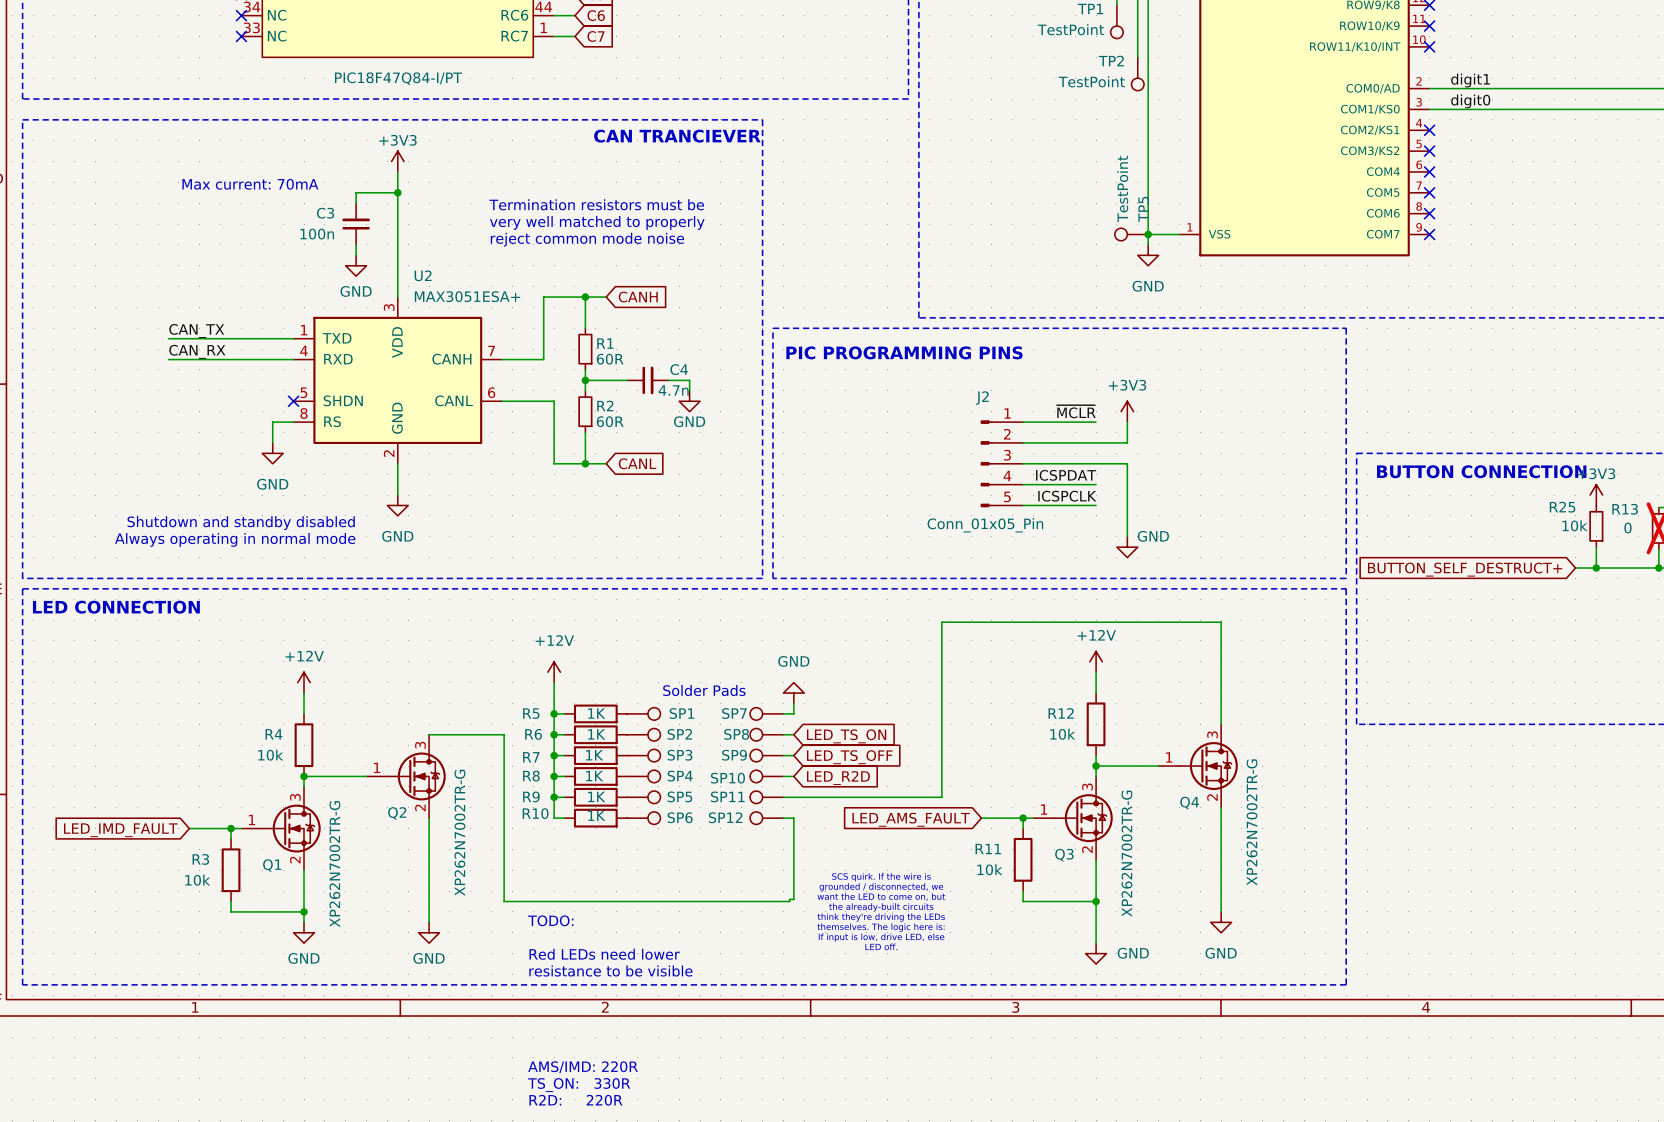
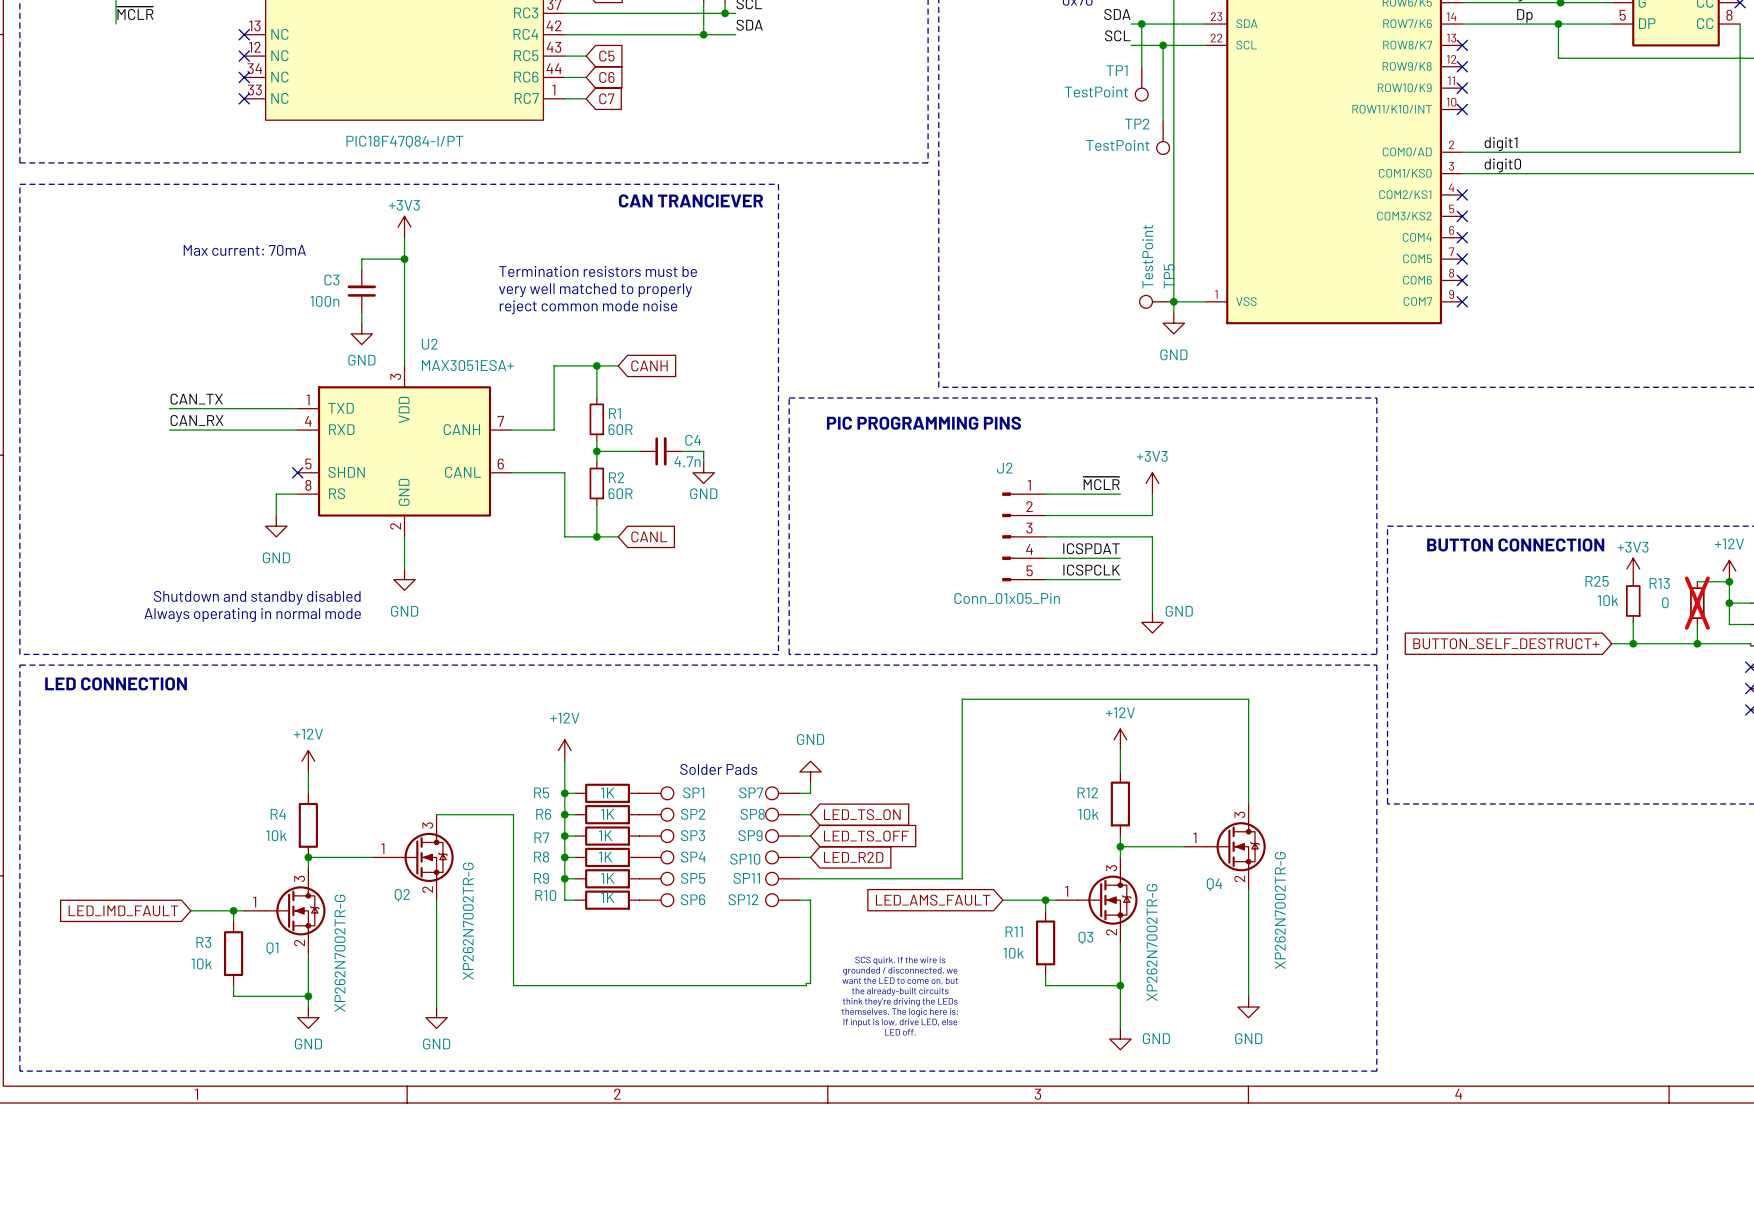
text: TODO: (550, 920) -> none
text: Red LEDs need lower (604, 954) -> none
text: resistance to be visible (610, 971) -> none
text: AMS/IMD: 220R (582, 1067) -> none
text: TS_ON: 330R (579, 1085) -> none
text: R2D: 220R (575, 1100) -> none

